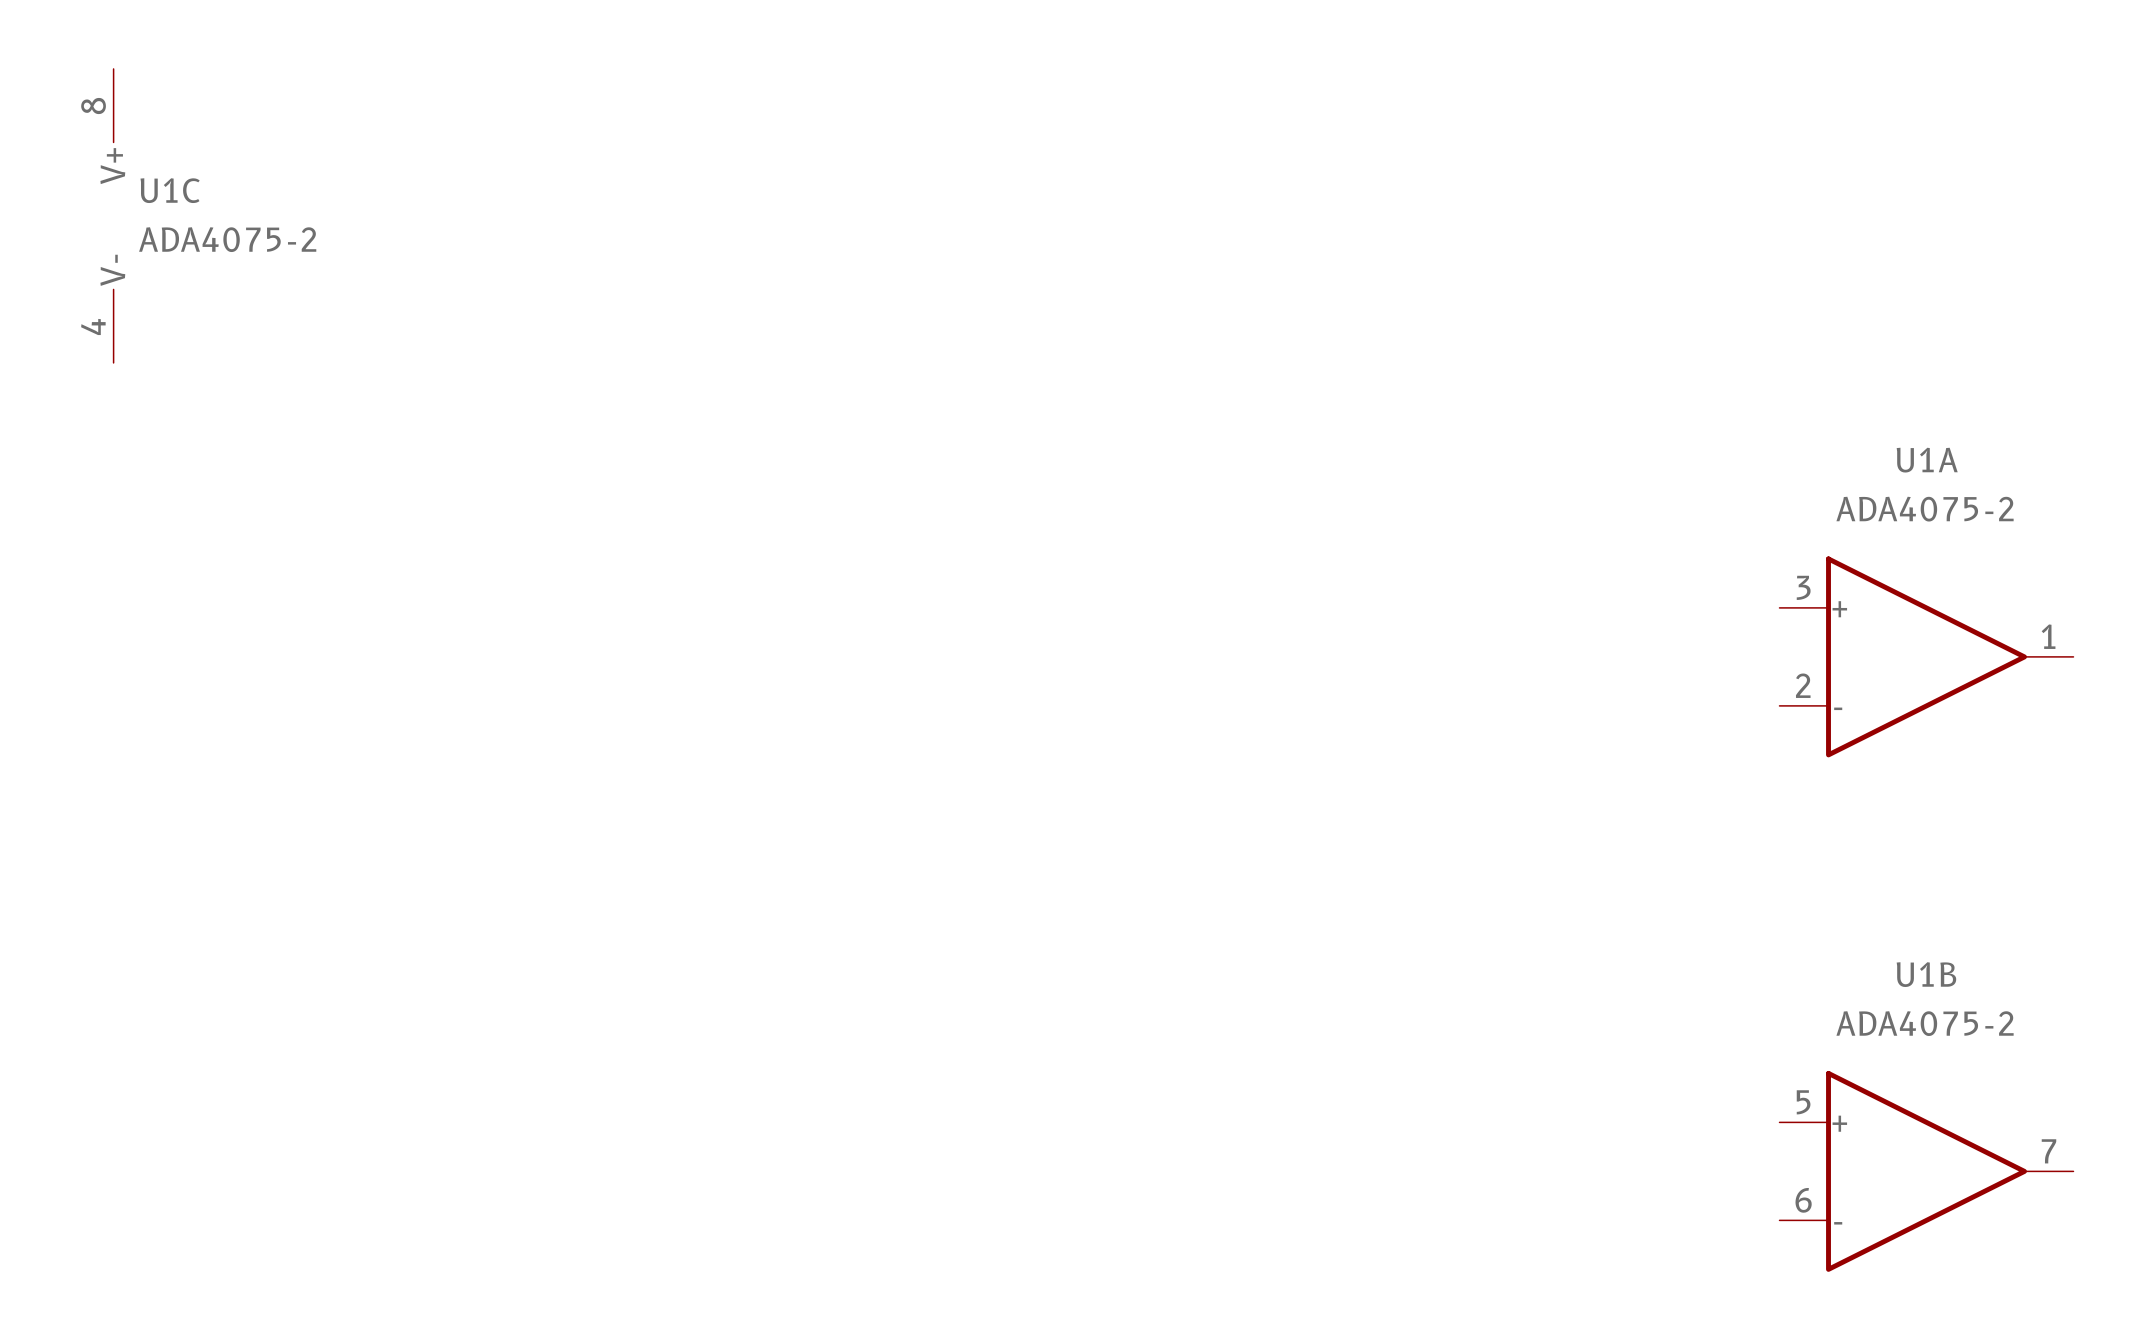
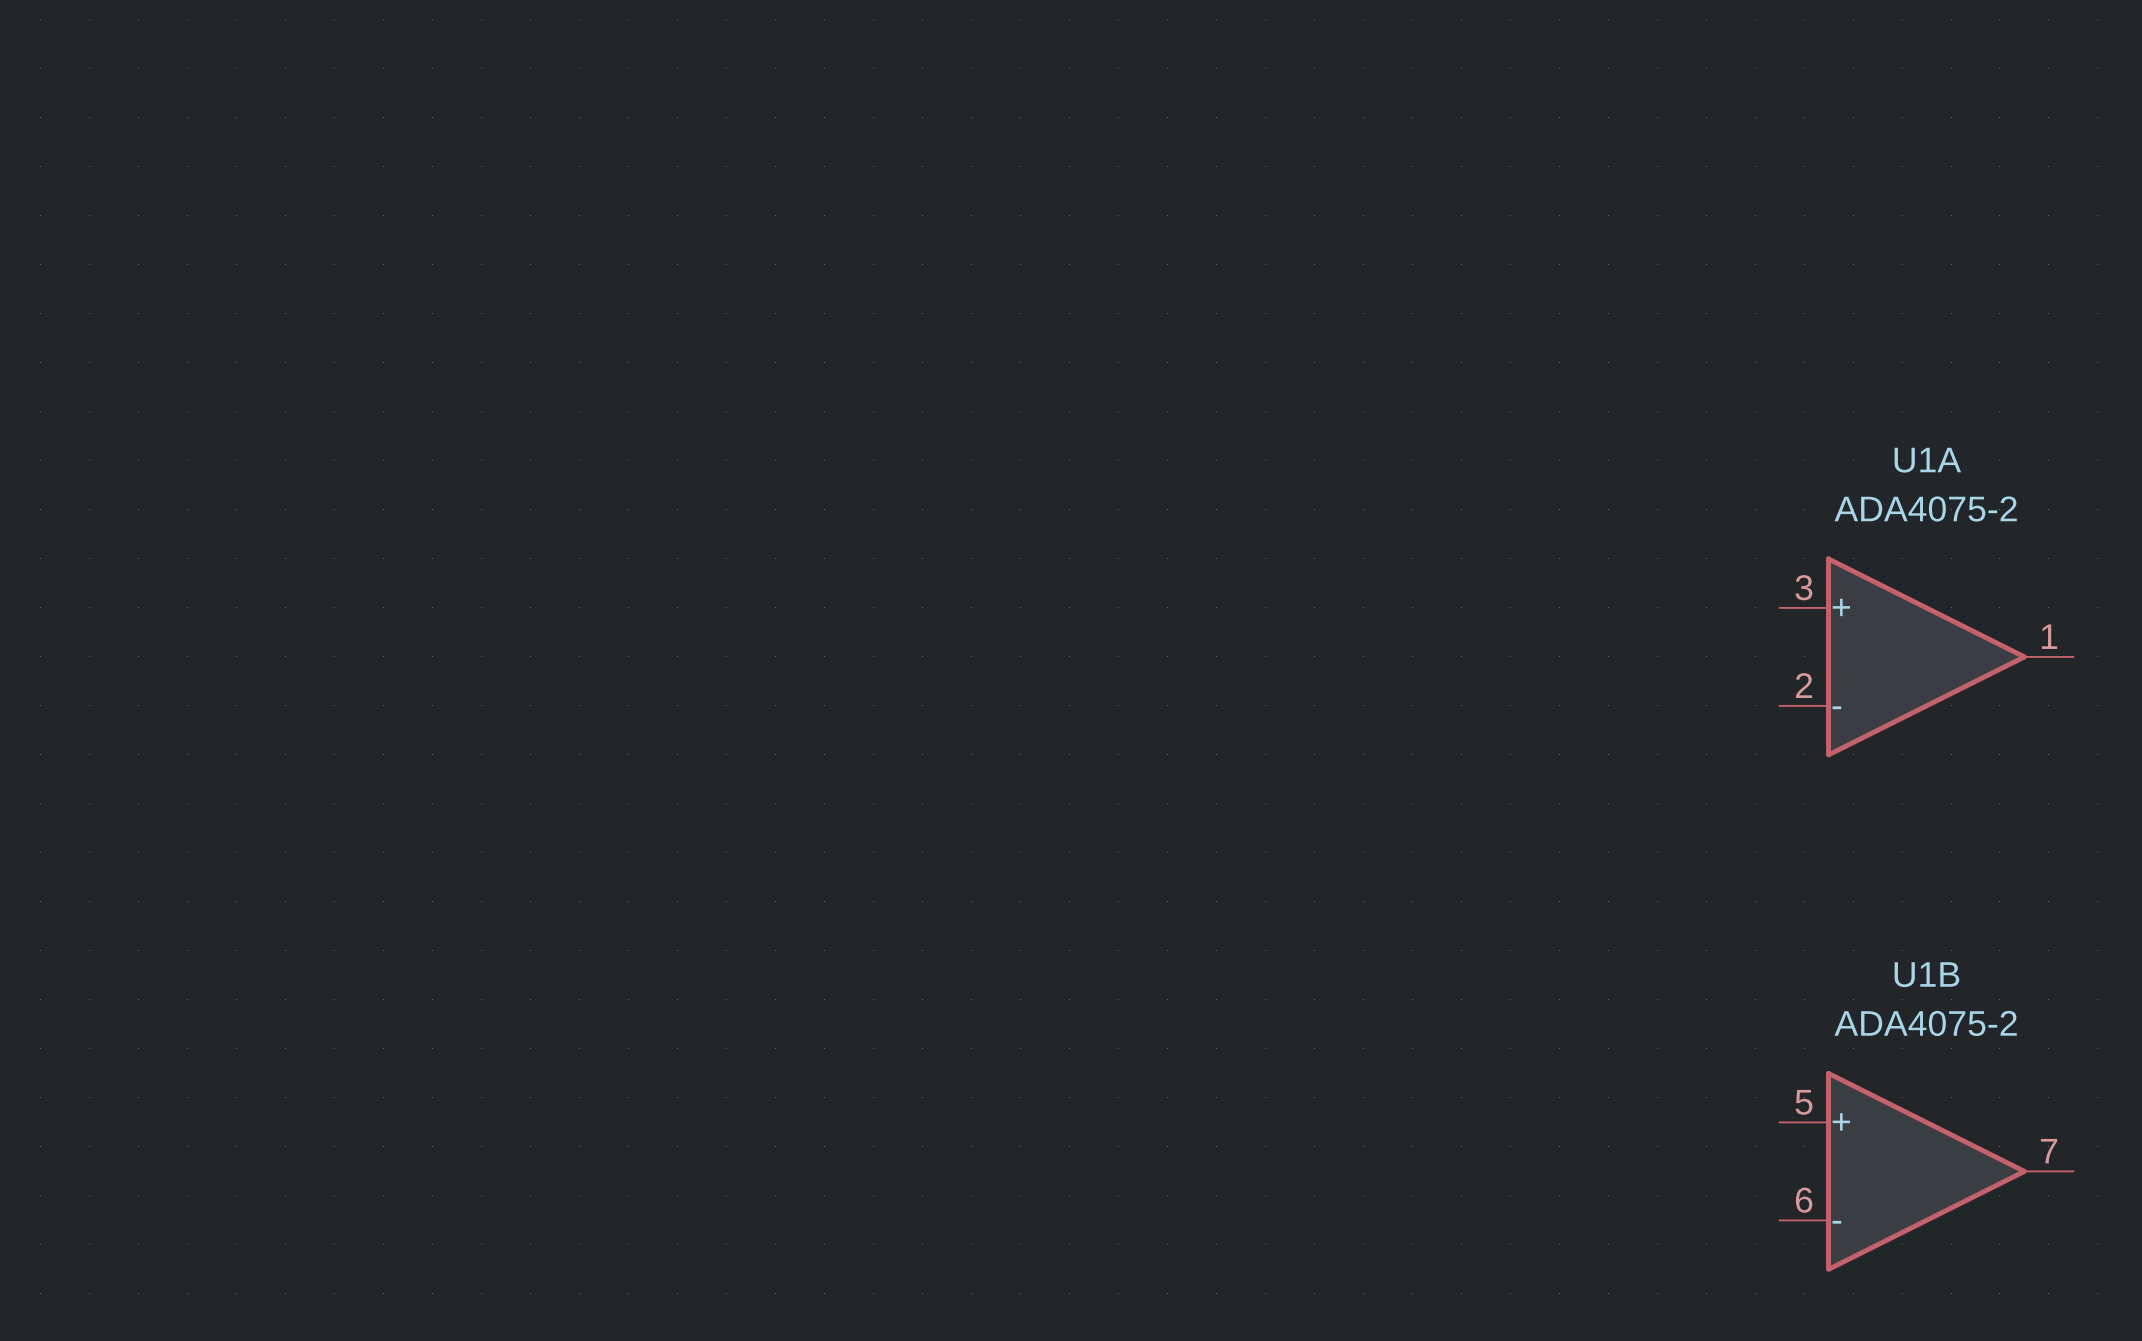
U1C: ADA4075-2 (113, 215) -> none

